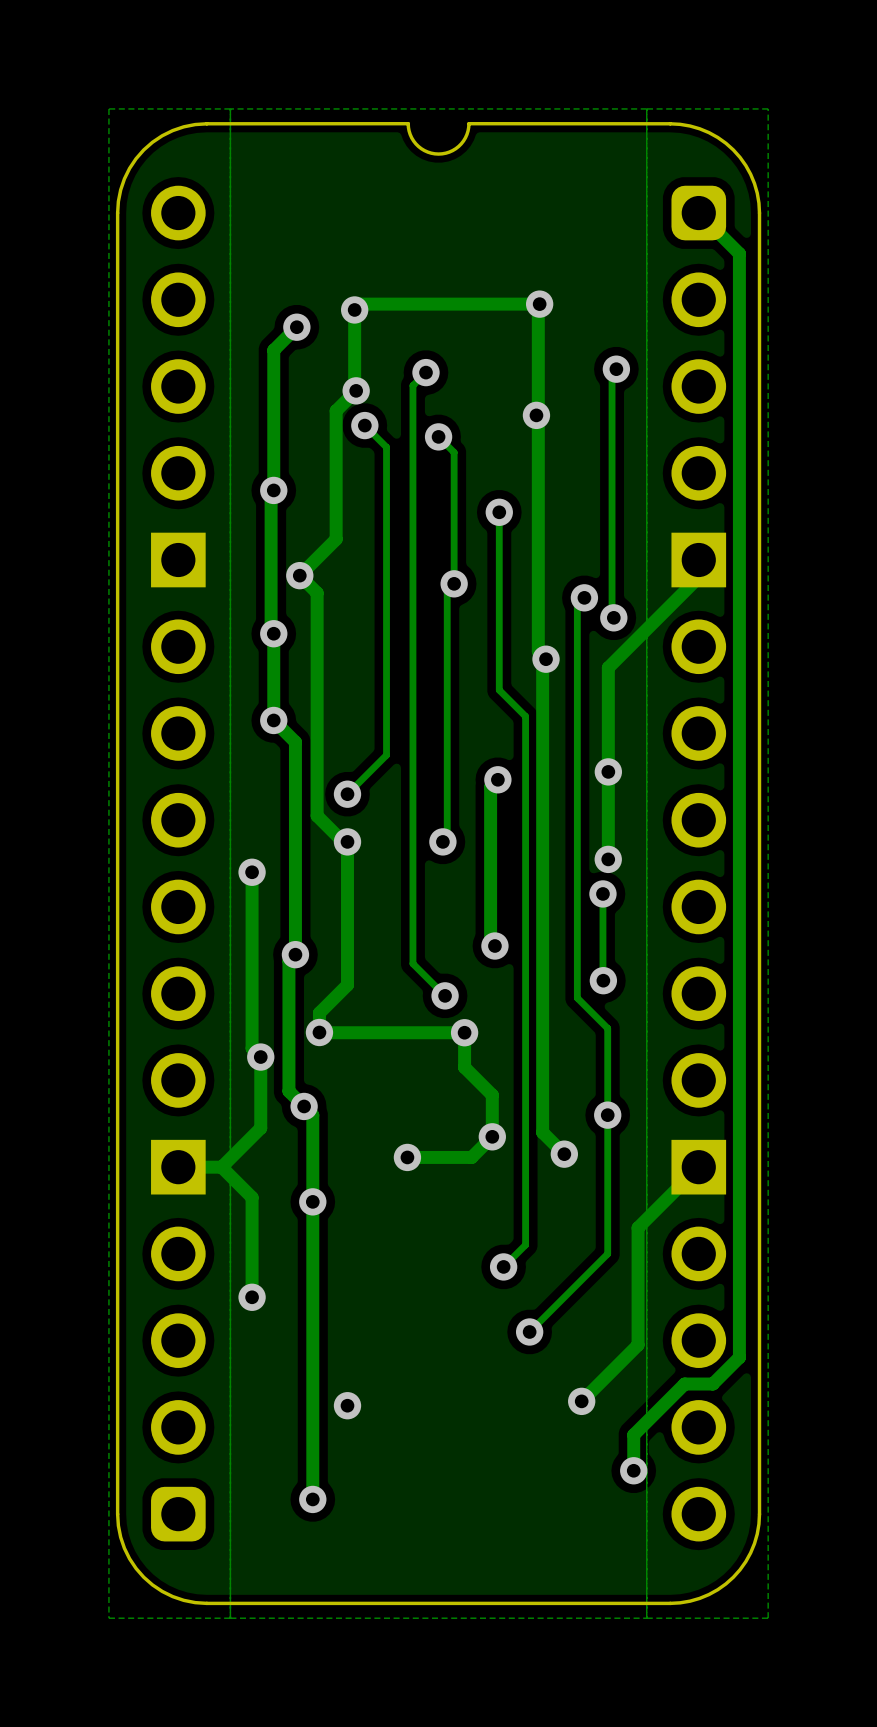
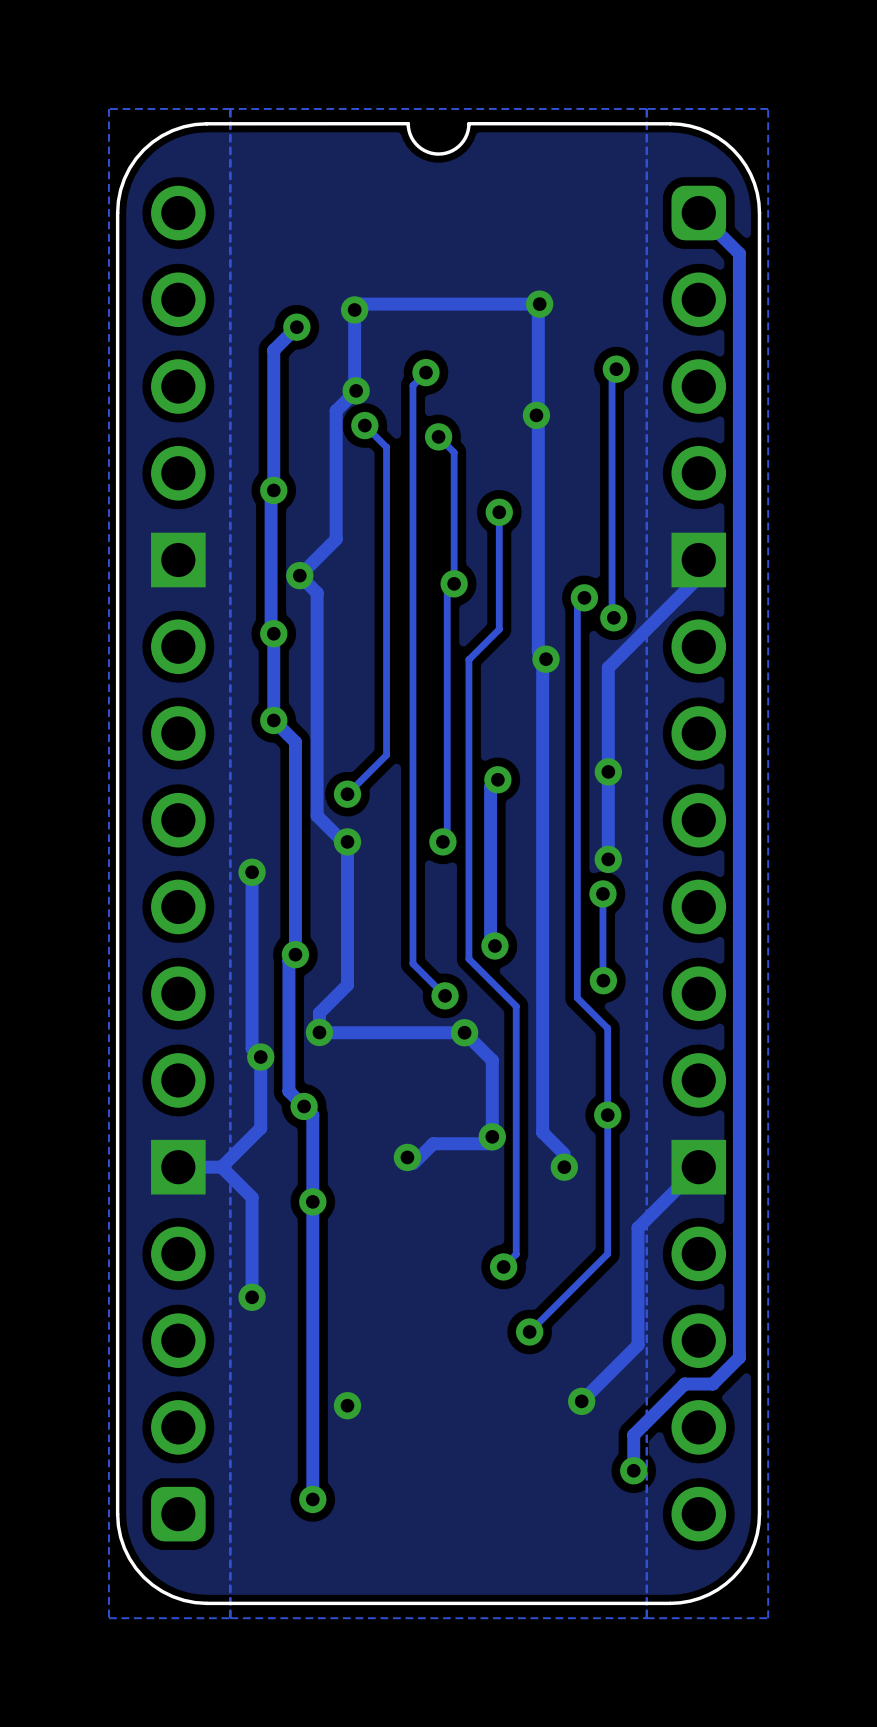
track: (499, 629) (499, 690) (525, 716) (525, 1244) (516, 1254) -> (499, 629) (468, 659) (468, 959) (516, 1006) (516, 1254)
track: (464, 1032) (464, 1067) (492, 1095) -> (464, 1032) (492, 1060) (492, 1095)
track: (492, 1136) (471, 1157) (407, 1157) -> (492, 1136) (492, 1143) (433, 1143) (413, 1163)
via position: (564, 1154) -> (564, 1167)

